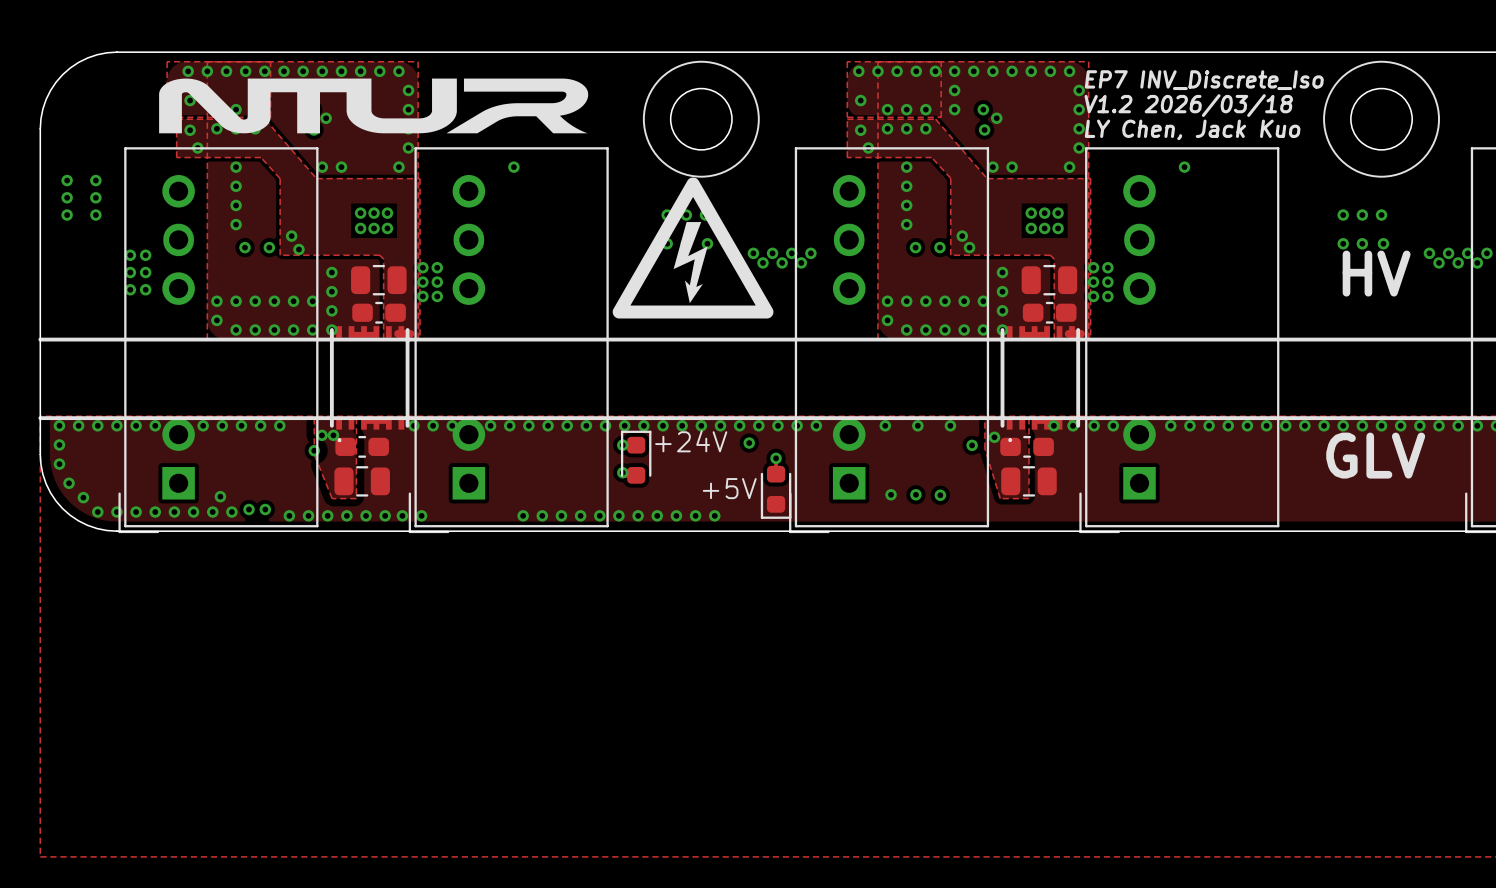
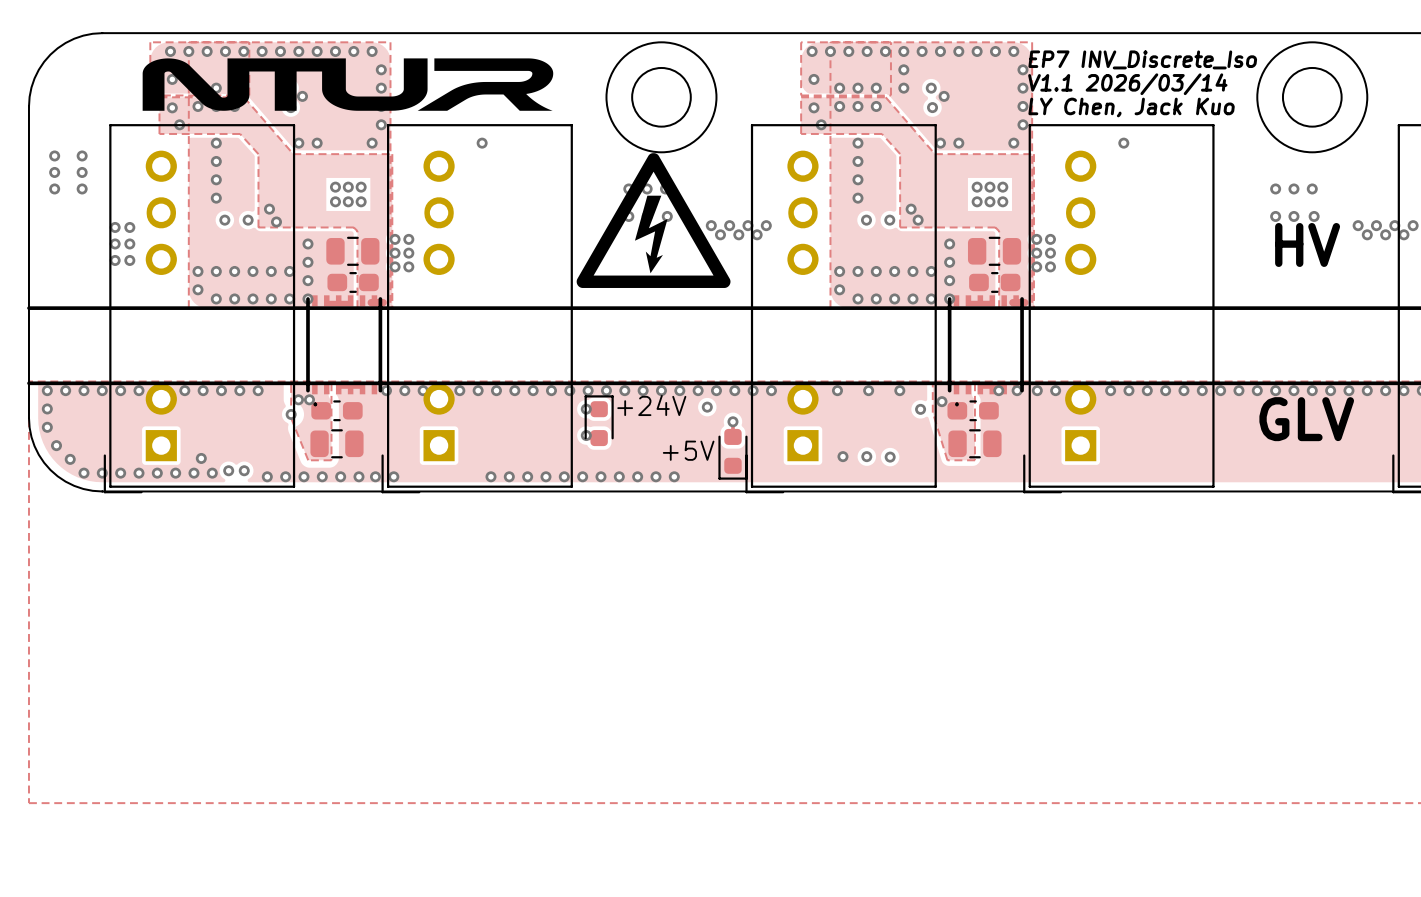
text: V1.2 2026/03/18 (1188, 105) -> V1.1 2026/03/14 (1127, 84)

